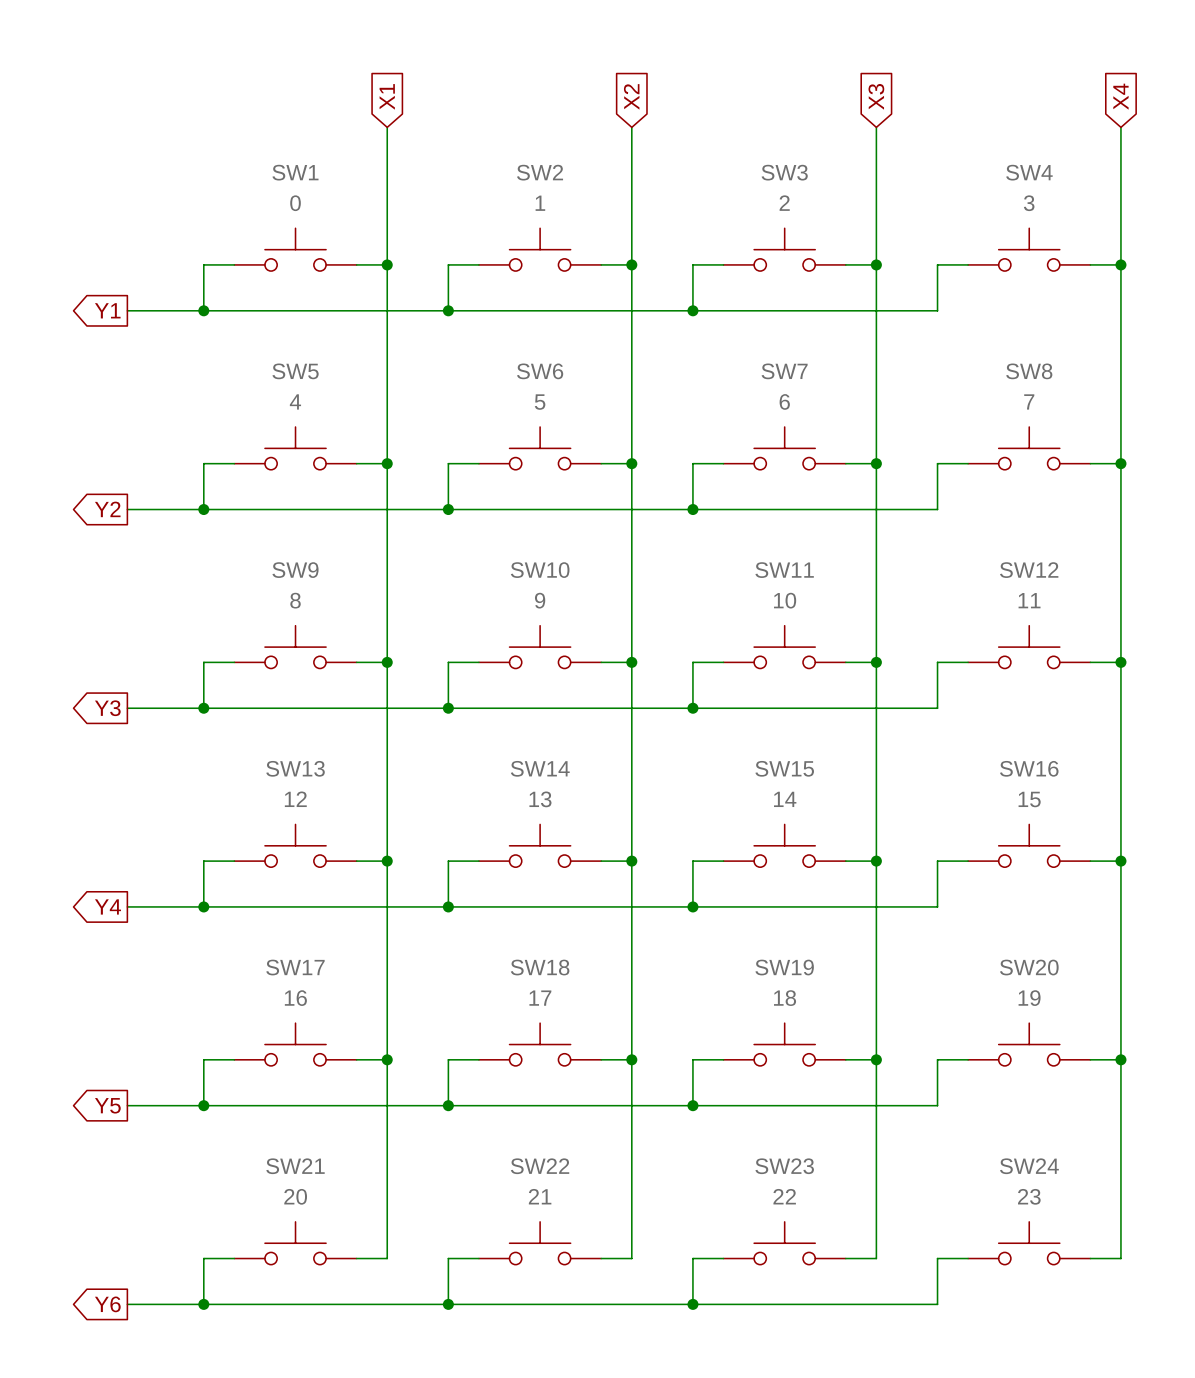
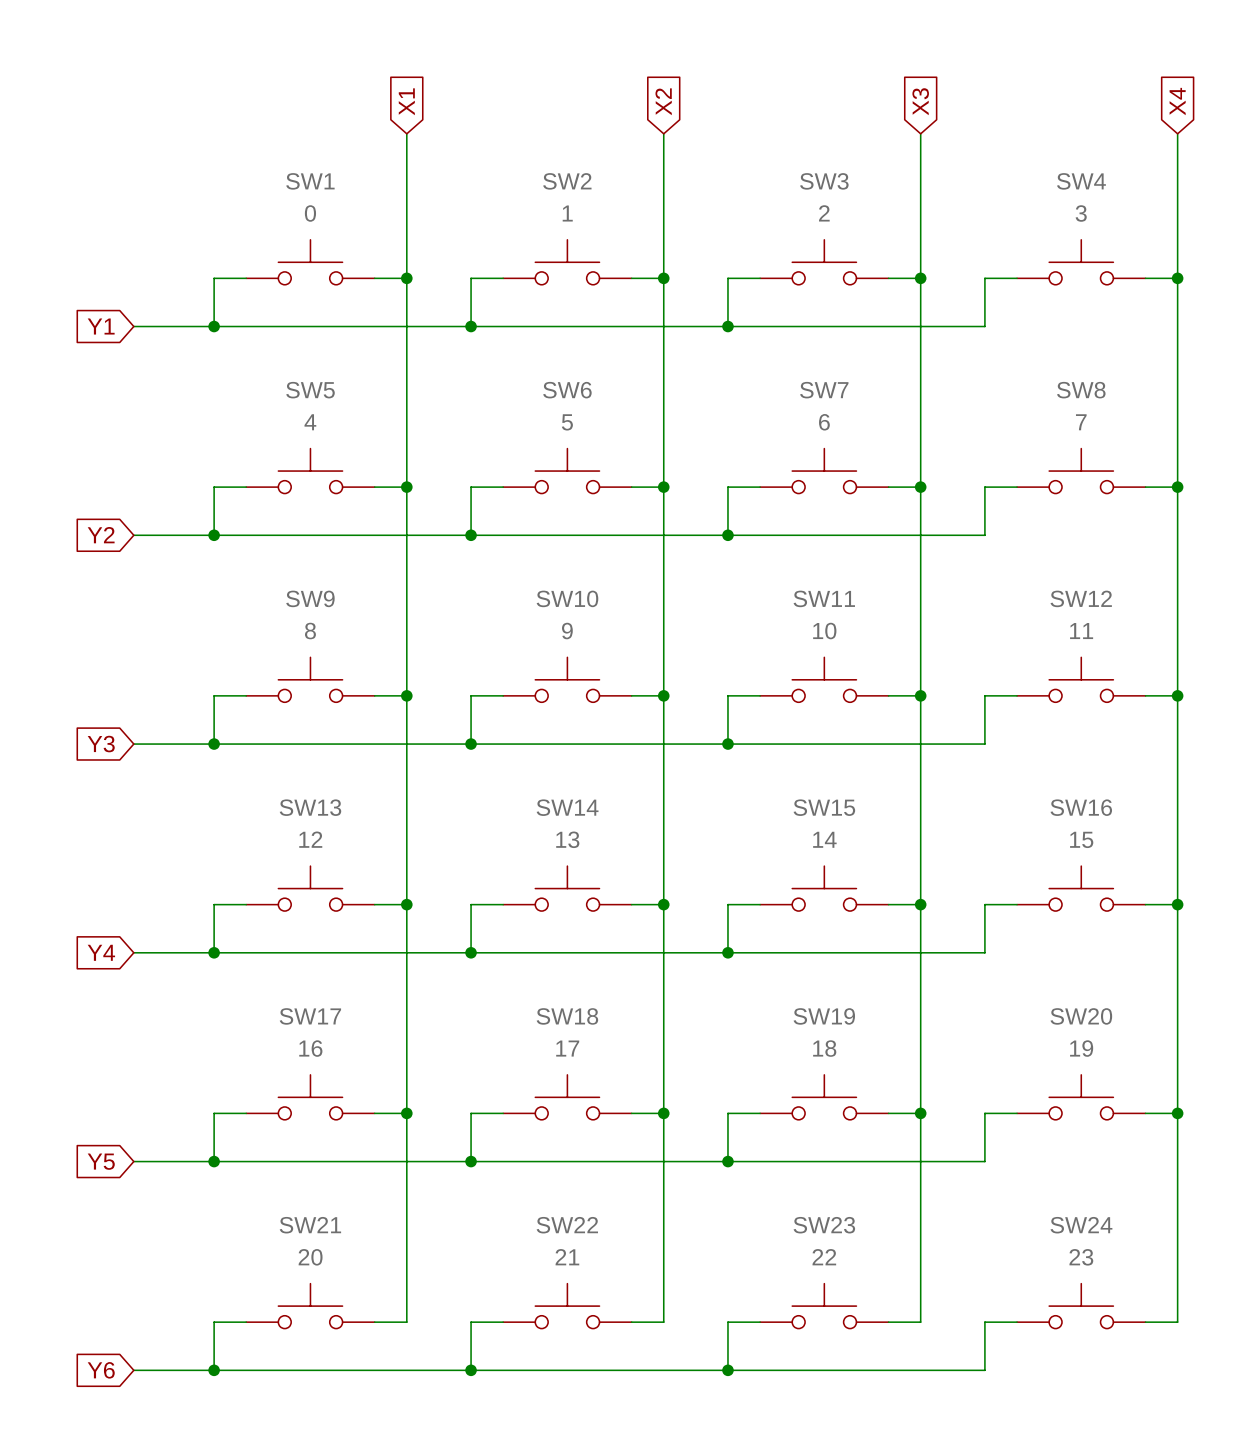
global label shape: output (107, 310) -> input (101, 326)
global label shape: output (107, 509) -> input (101, 535)
global label shape: output (107, 708) -> input (101, 744)
global label shape: output (107, 906) -> input (101, 952)
global label shape: output (107, 1105) -> input (101, 1161)
global label shape: output (107, 1304) -> input (101, 1370)

